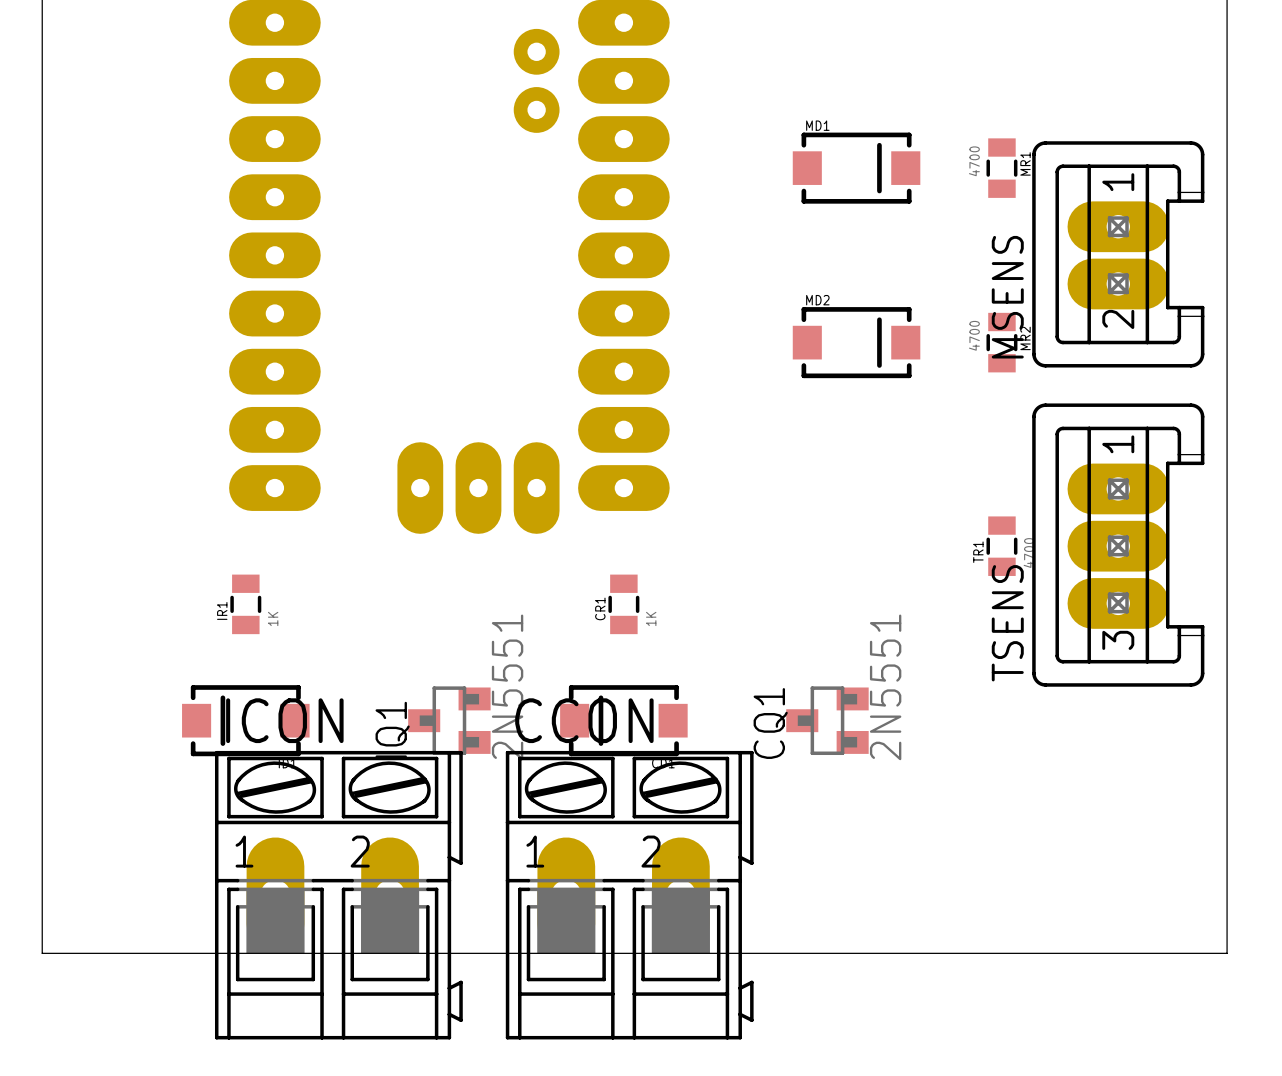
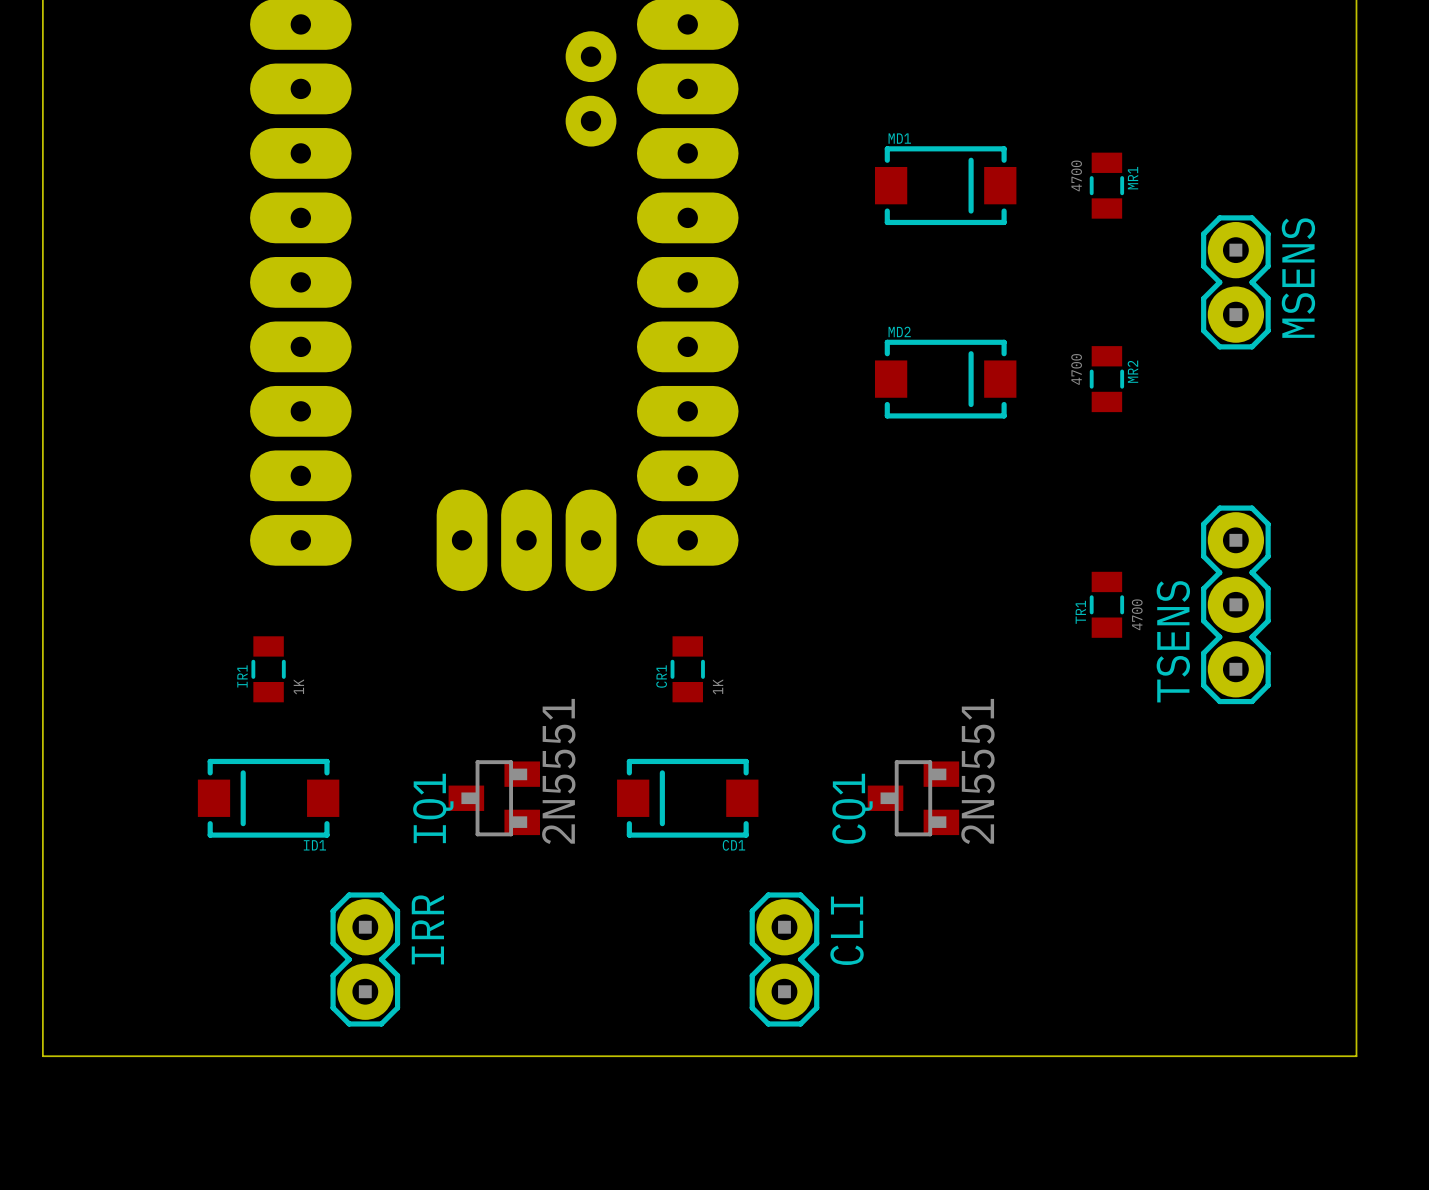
MSENS footprint: [1032, 141, 1205, 368] -> [1201, 215, 1271, 350]
MSENS name position: MSENS (1007, 297) -> MSENS (1298, 278)
TSENS footprint: [1032, 403, 1205, 687] -> [1201, 505, 1271, 705]
TSENS name position: TSENS (1007, 623) -> TSENS (1173, 641)
IRR: none -> (365, 959)
CLI: none -> (784, 959)
ICON: (338, 895) -> none
CCON: (629, 895) -> none

